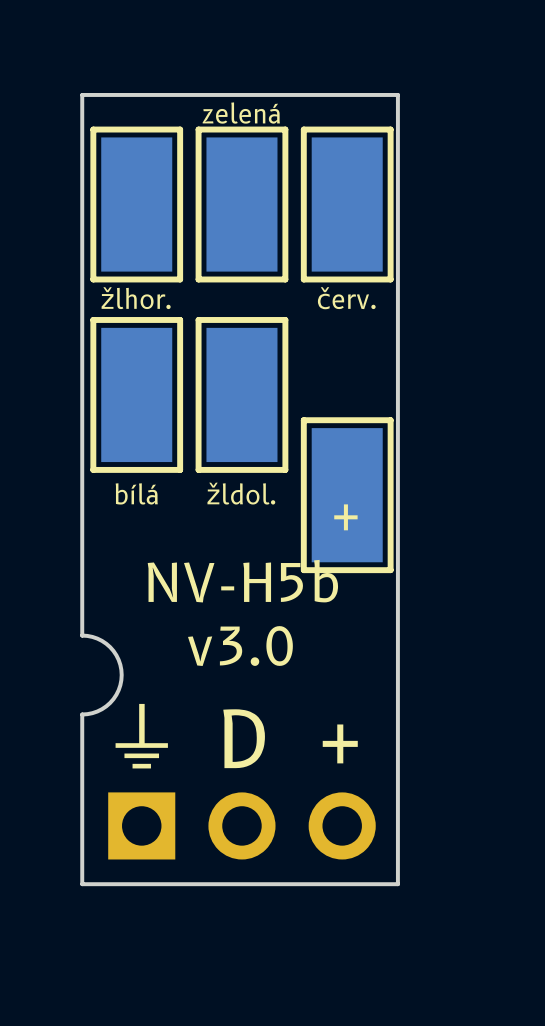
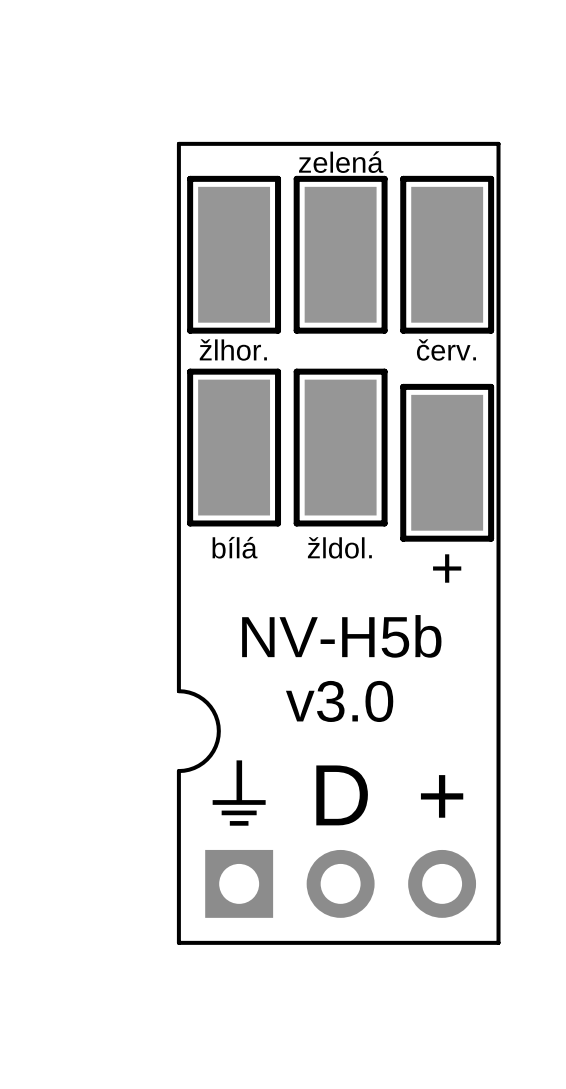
part position: (347, 495) -> (447, 462)

